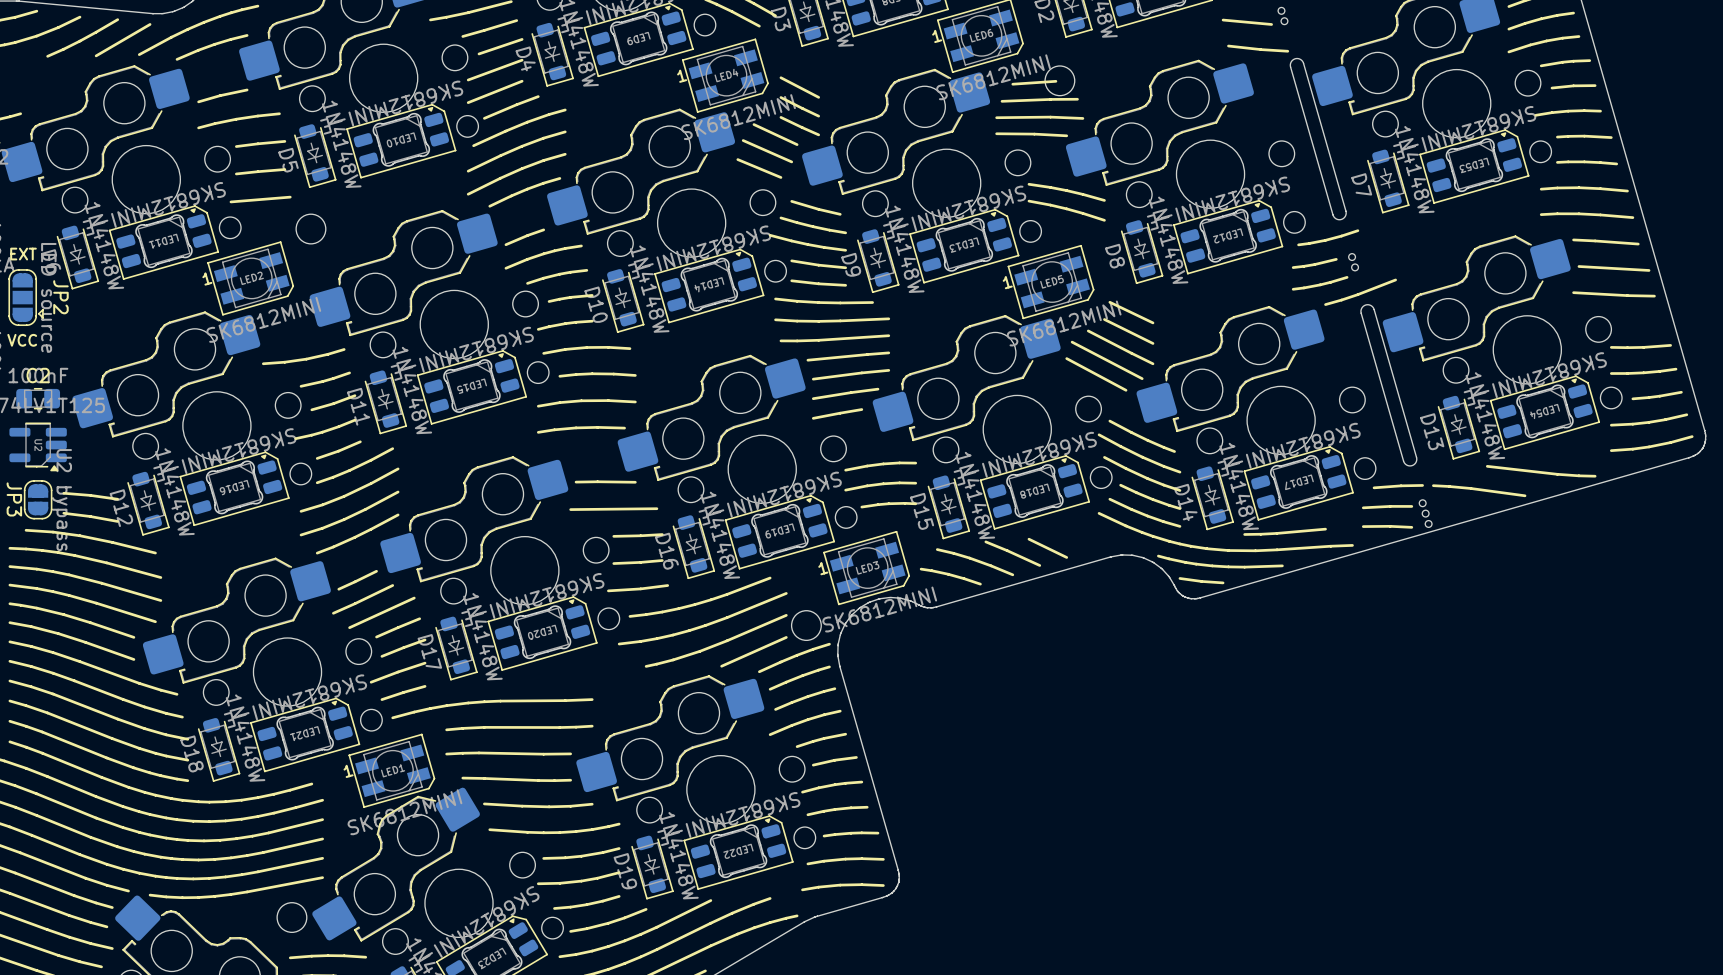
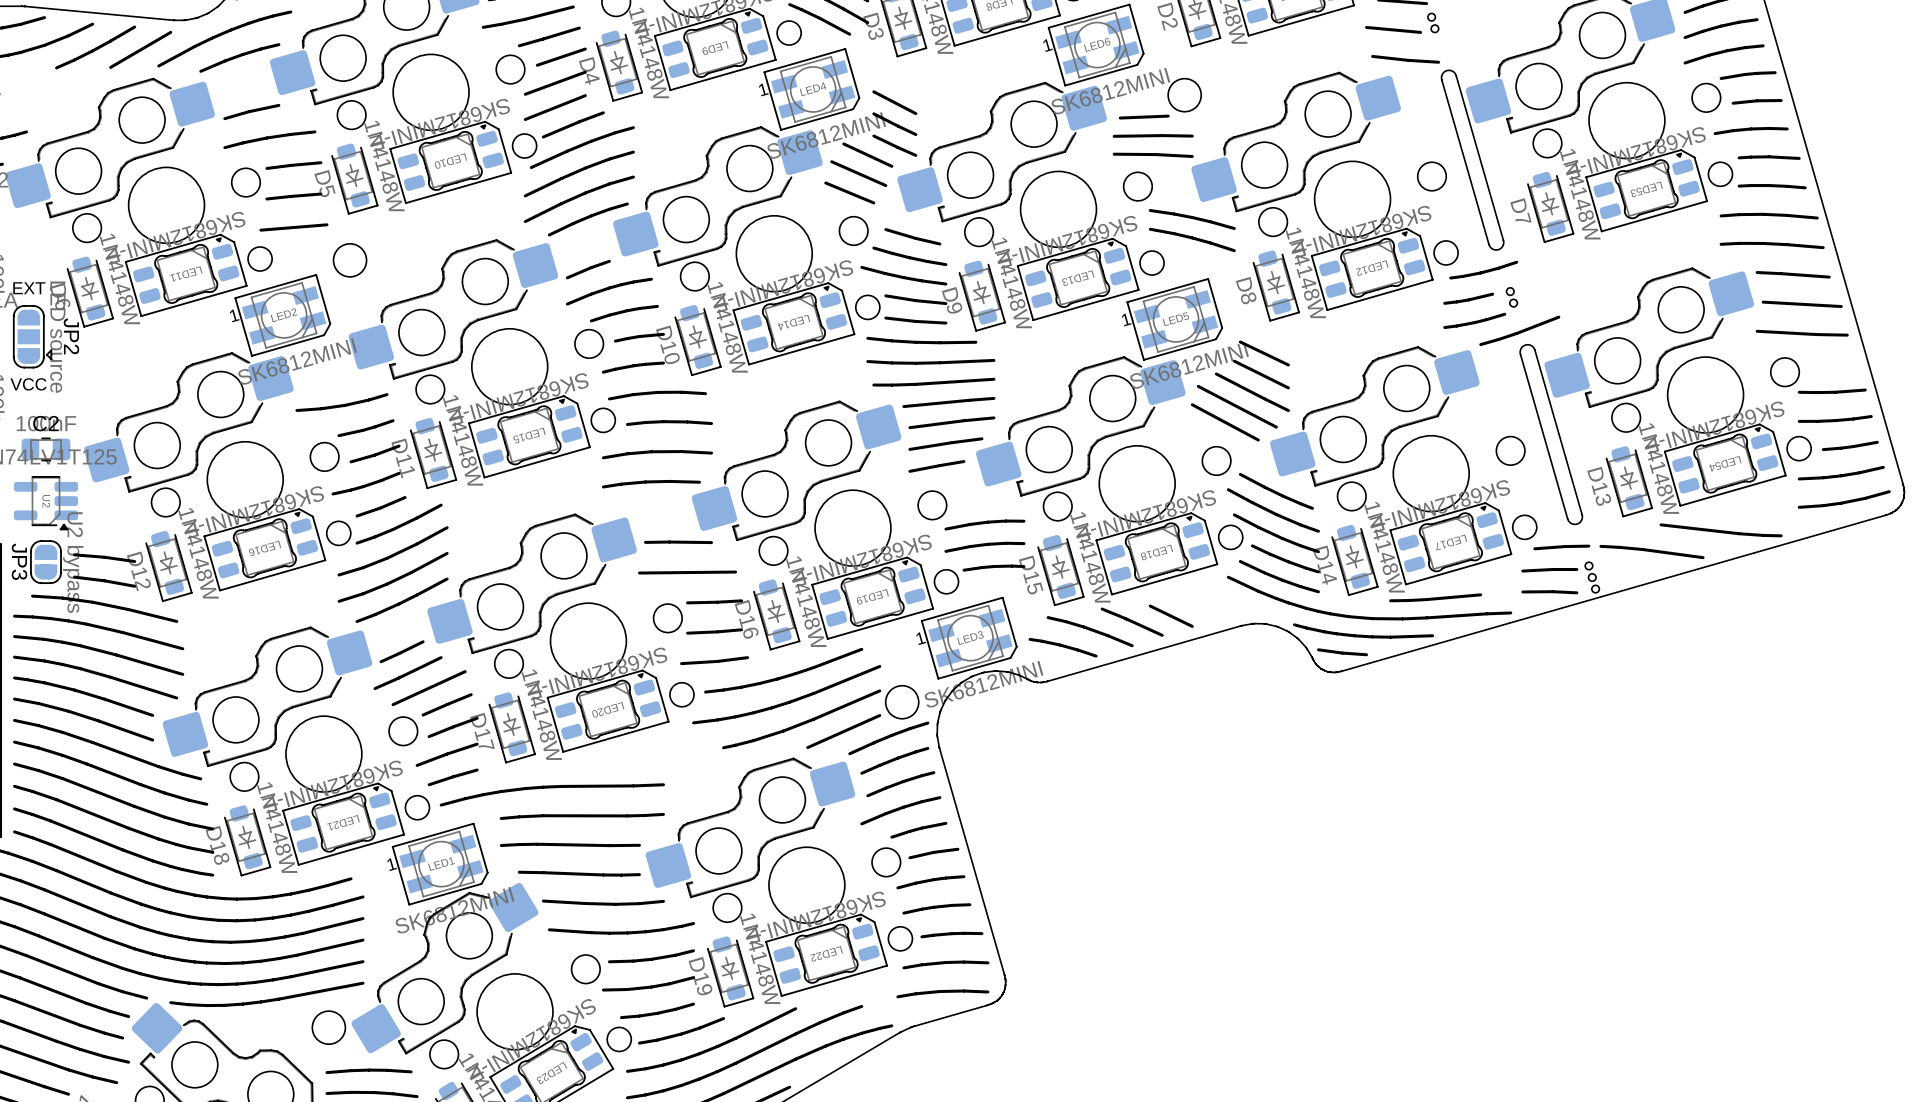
line: (1055, 81) (1012, 84) -> none
line: (1077, 99) (1002, 101) -> (1168, 116) (1120, 118)
line: (996, 117) (1082, 118) -> (1114, 136) (1192, 136)

